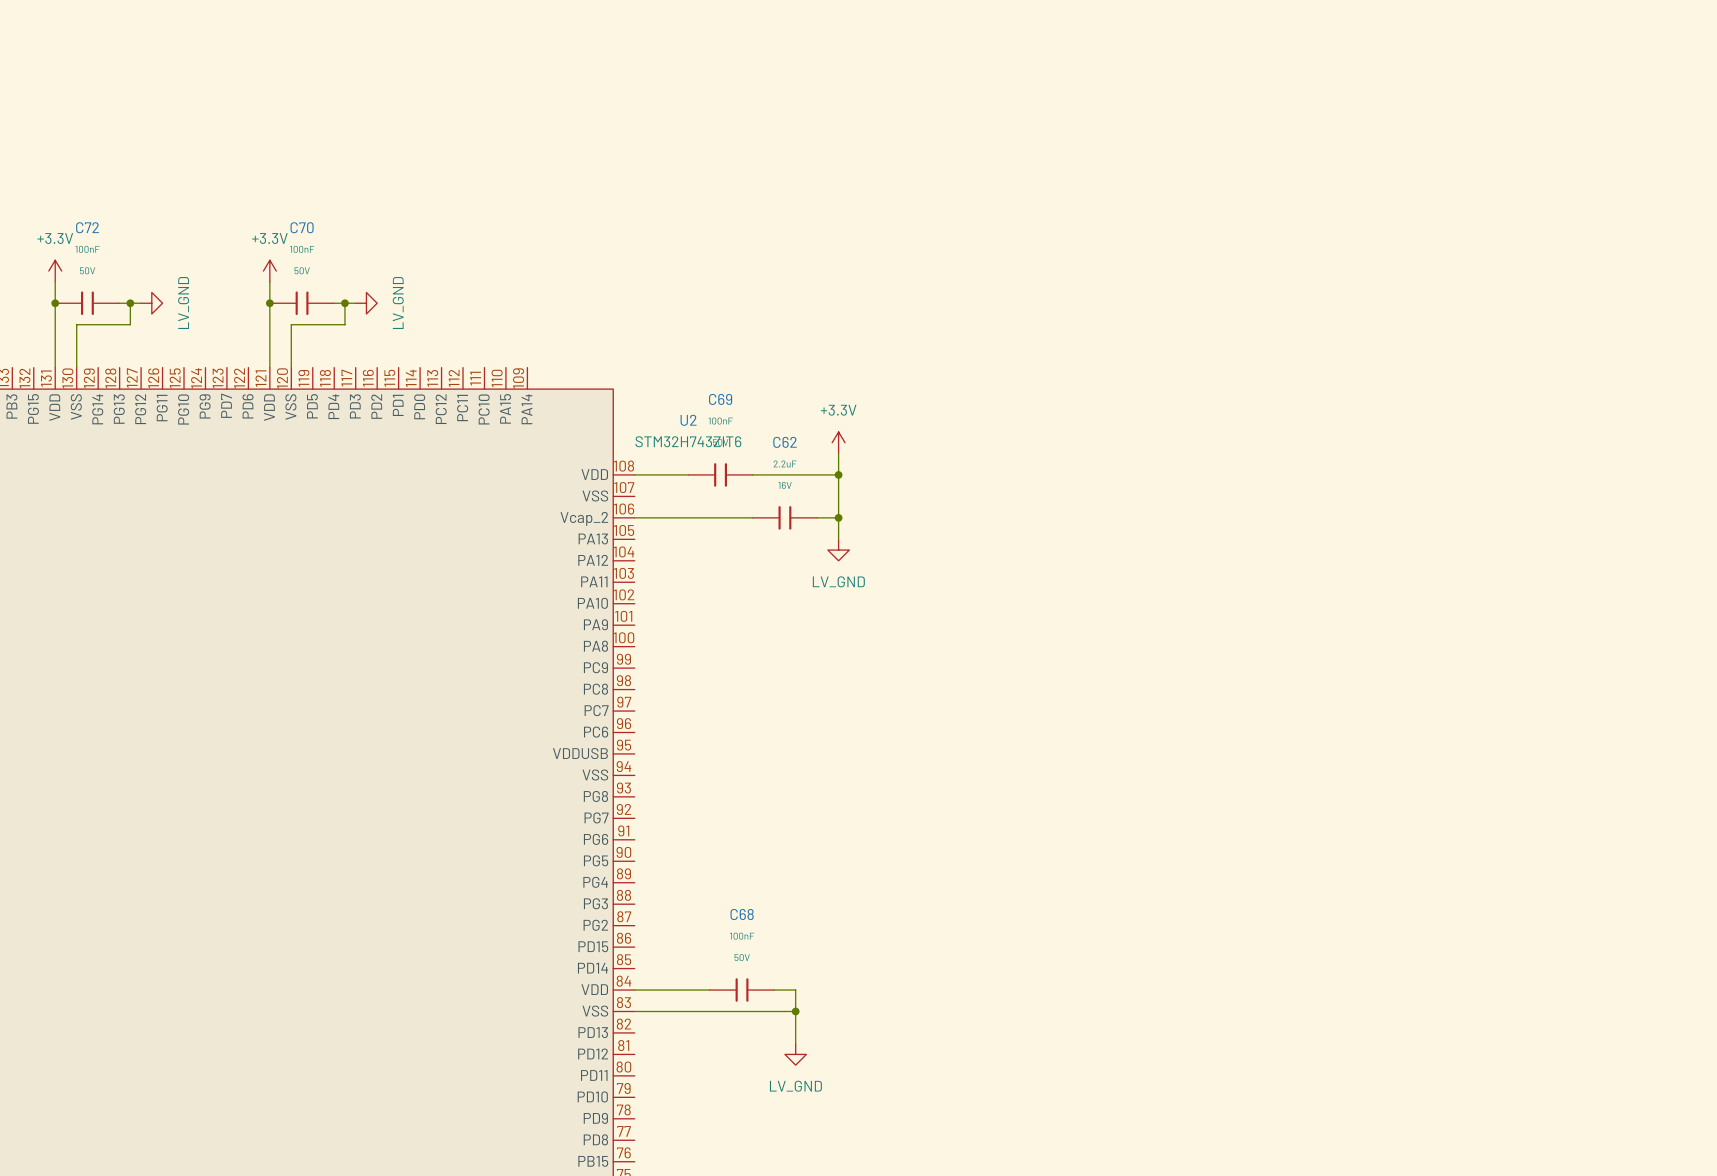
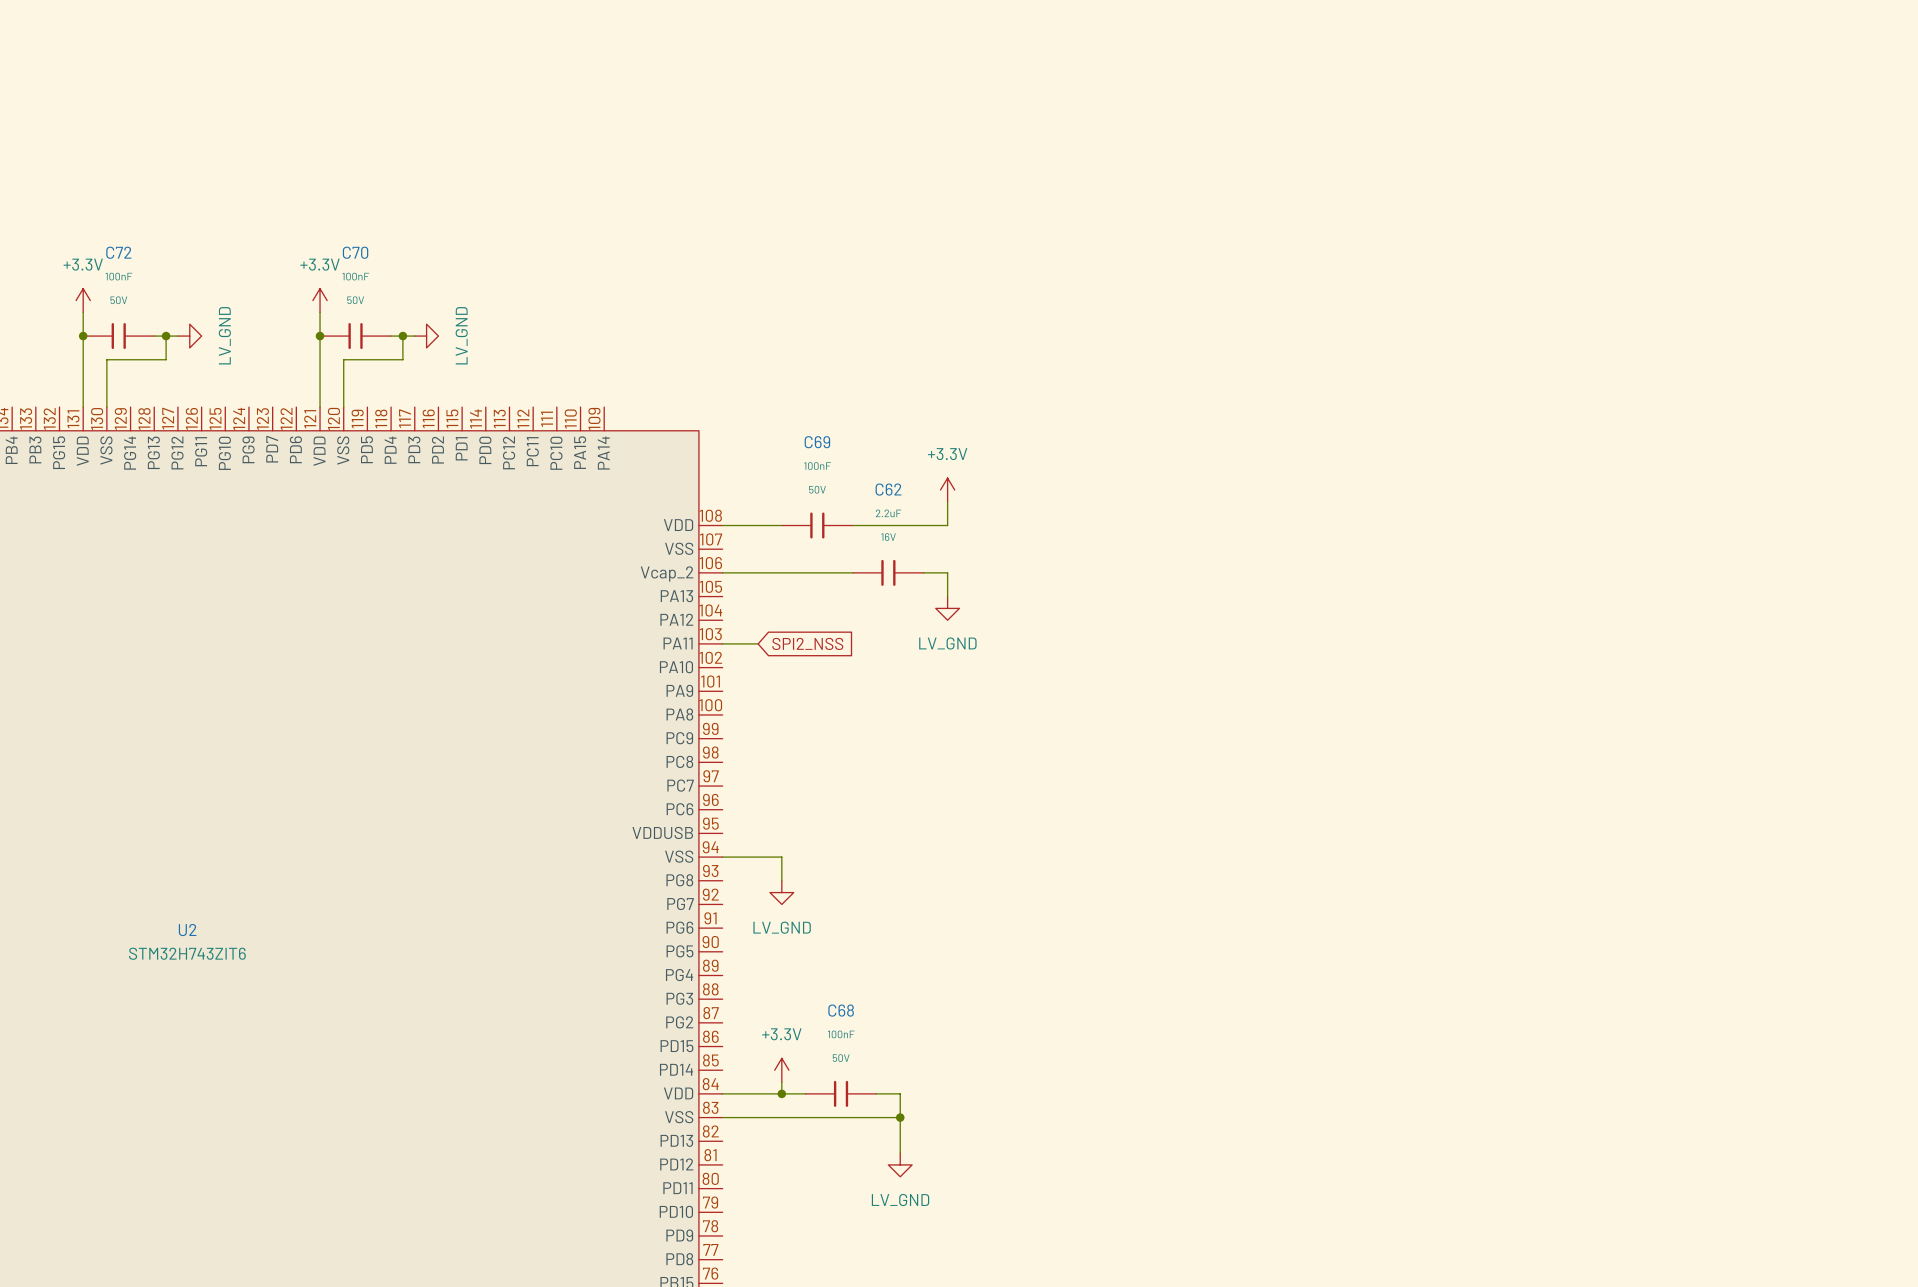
U2 name position: U2 (688, 420) -> U2 (187, 930)
U2 value position: STM32H743ZIT6 (688, 441) -> STM32H743ZIT6 (187, 953)
wire: (838, 474) (838, 517) -> none
junction: (838, 474) -> none
junction: (838, 517) -> none
wire: none -> (722, 643) (758, 643)
global label: none -> SPI2_NSS (807, 643)
wire: none -> (722, 857) (781, 857) (781, 880)
power symbol: none -> LV_GND (781, 892)
power symbol: none -> +3.3V (781, 1070)
wire: none -> (781, 1082) (781, 1093)
junction: none -> (781, 1093)

